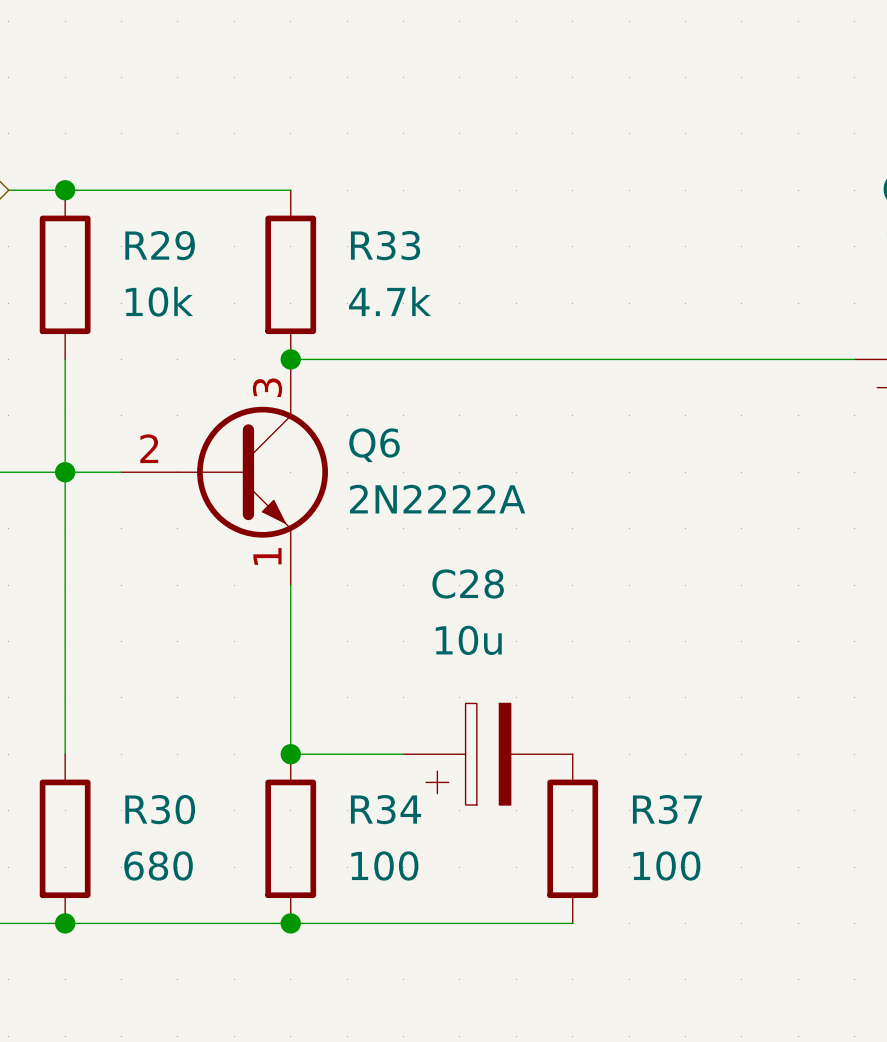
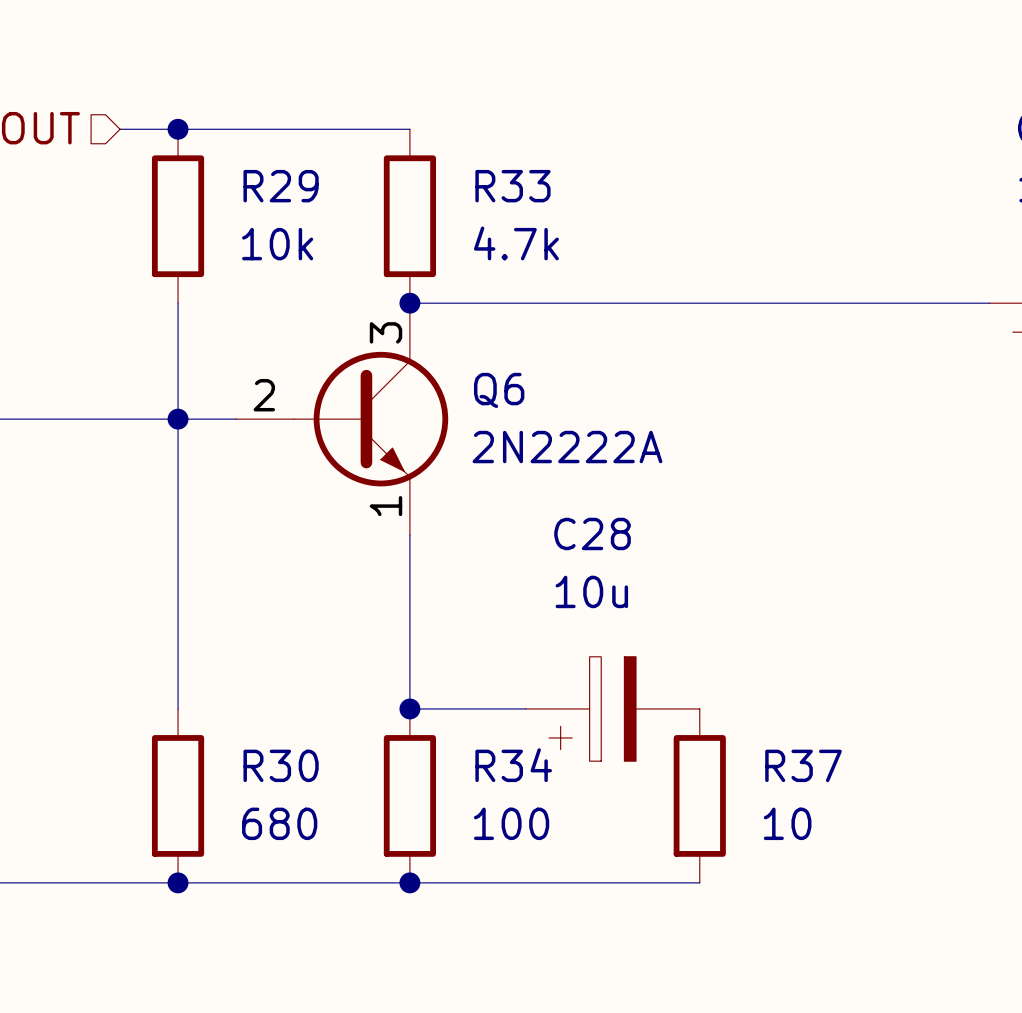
R37 value: 100 (666, 865) -> 10 (787, 823)

